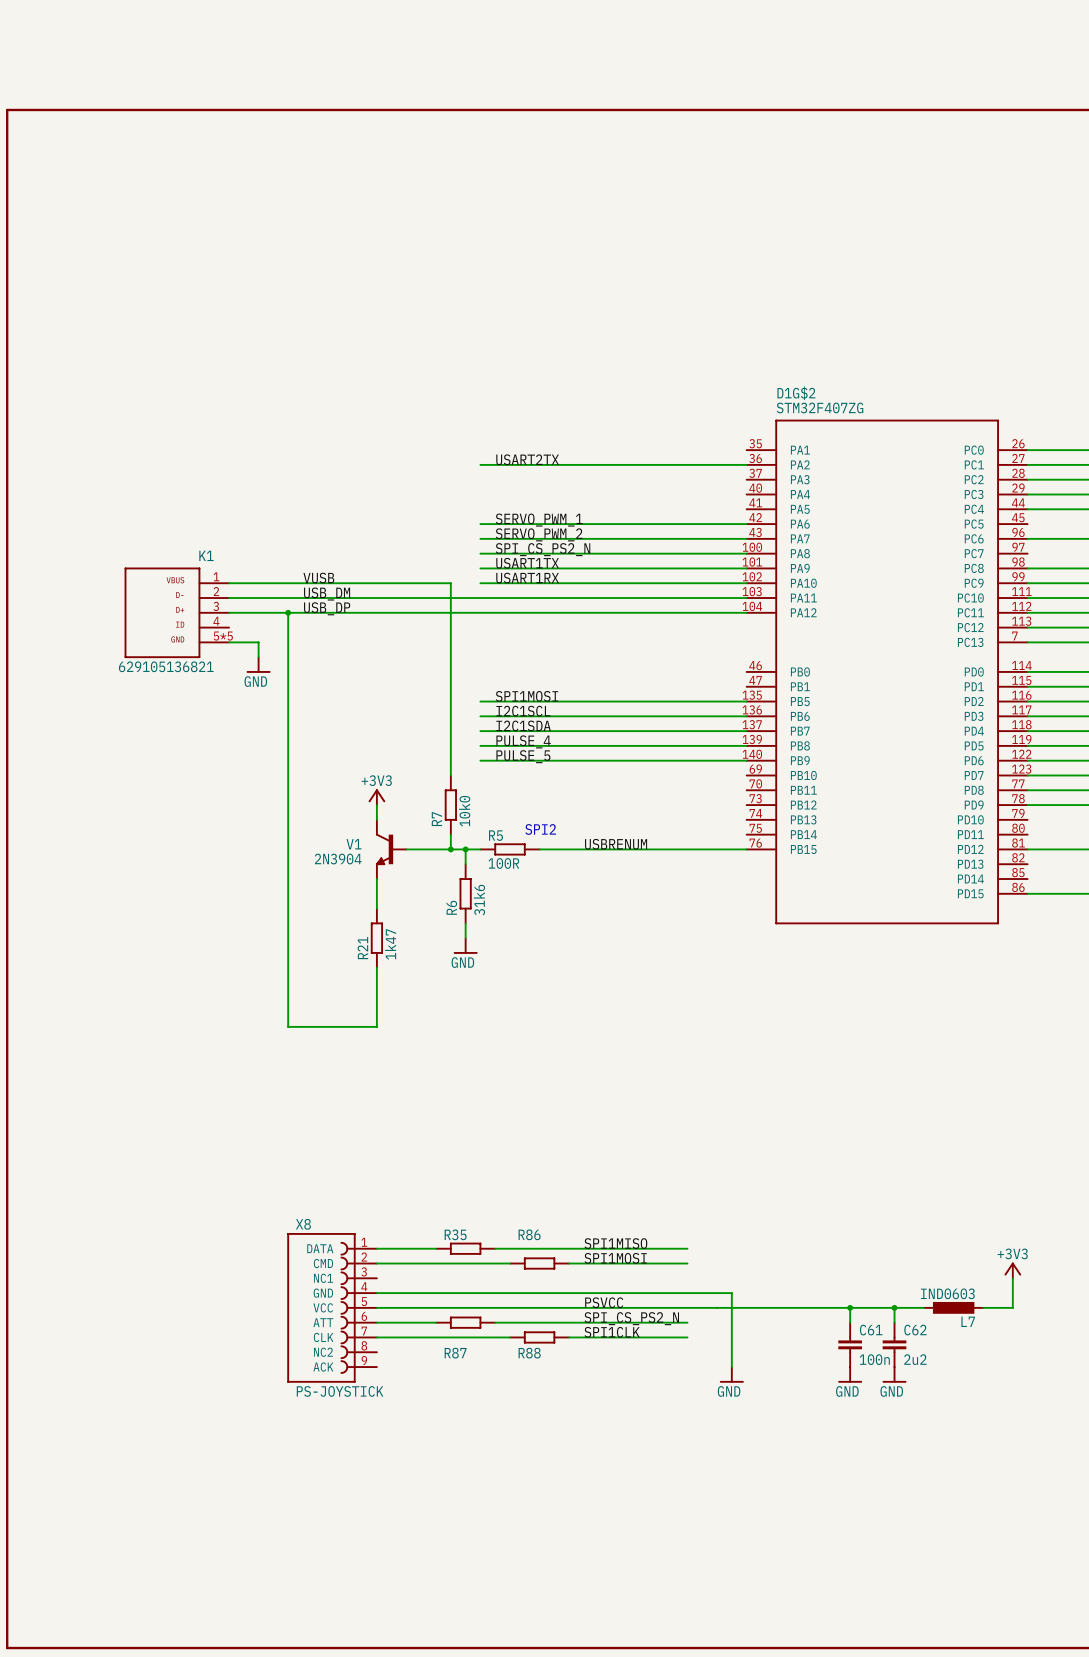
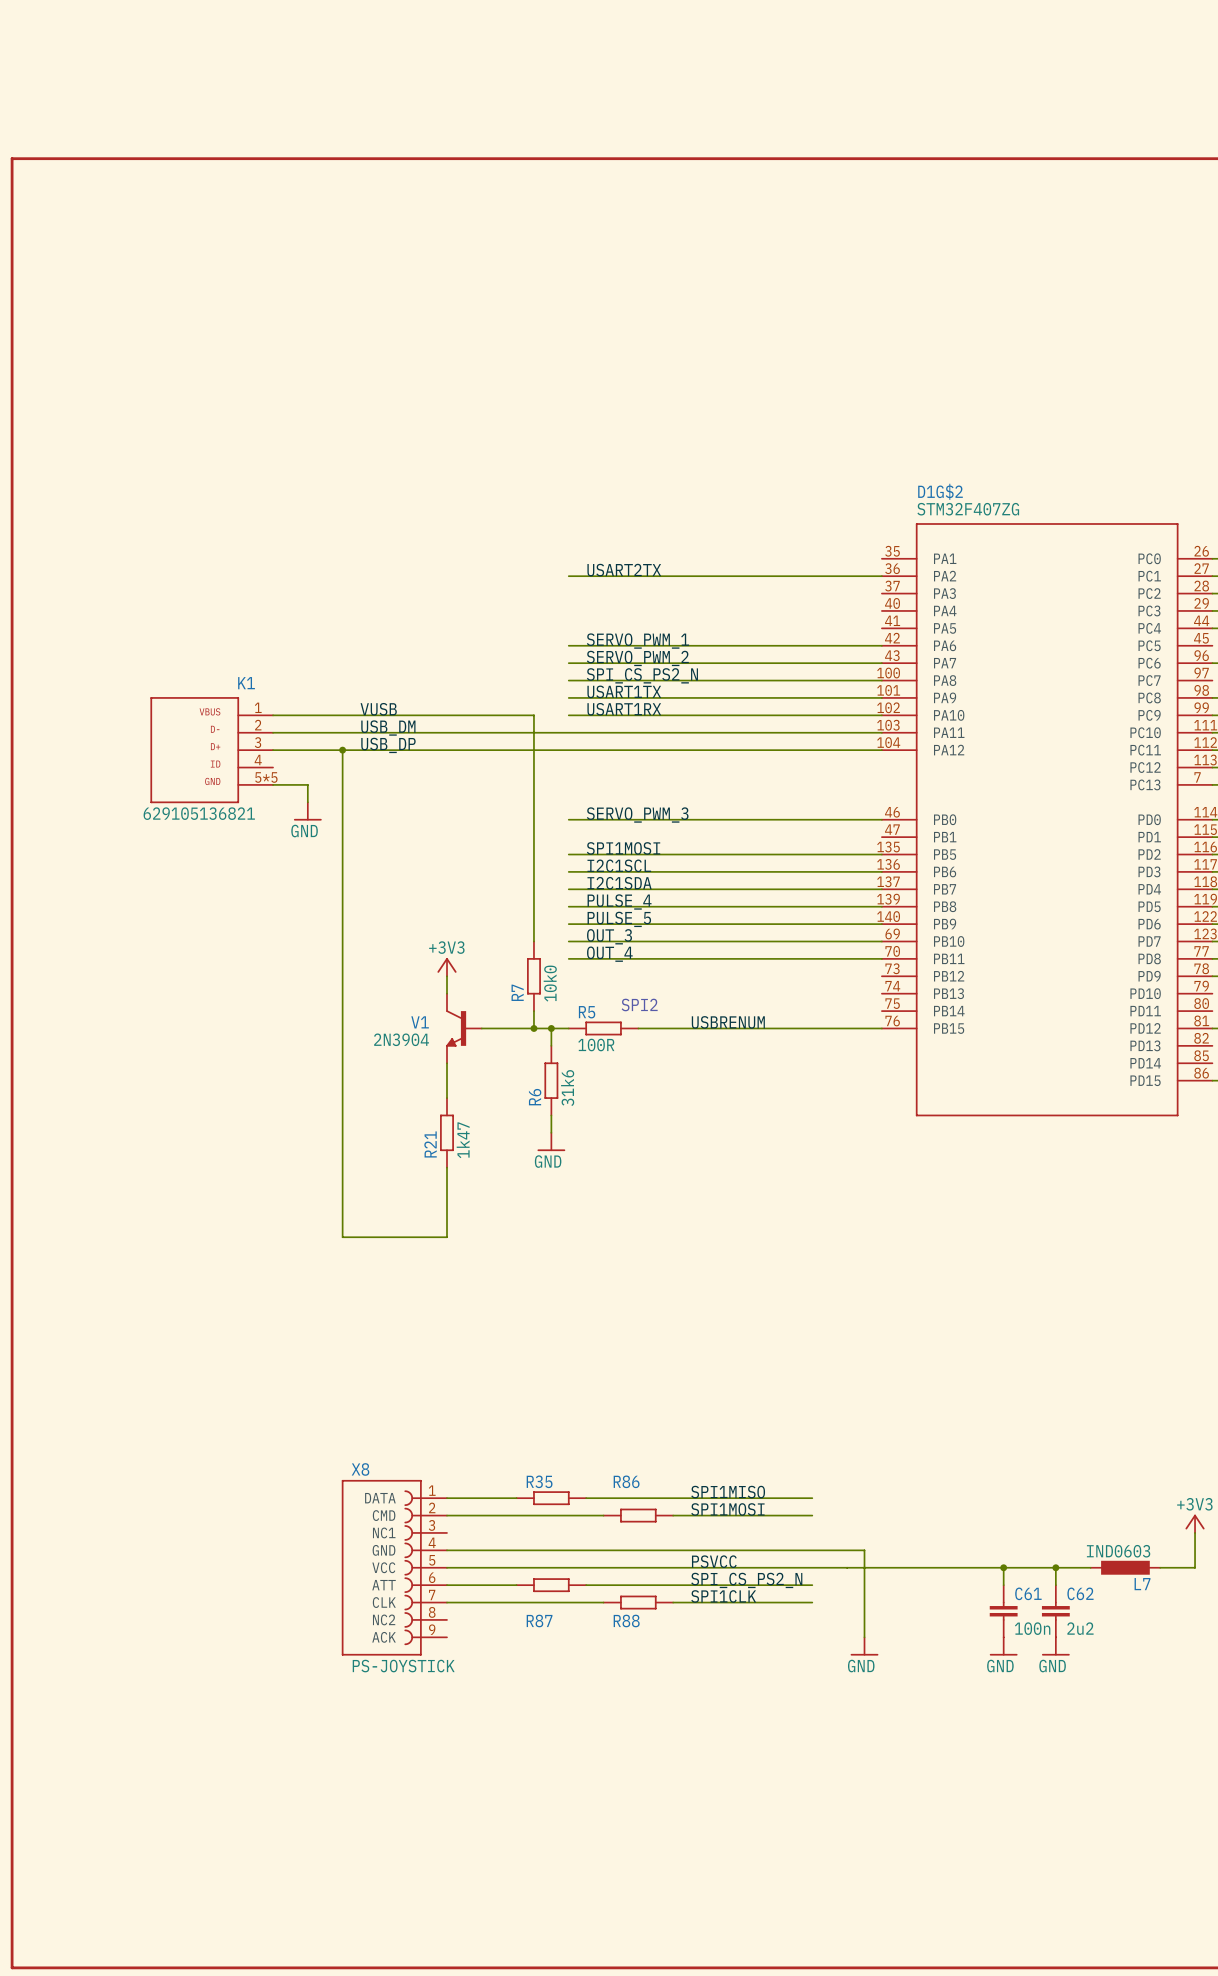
label: none -> SERVO_PWM_3 (637, 815)
wire: none -> (568, 819) (881, 819)
label: none -> OUT_3 (609, 936)
wire: none -> (568, 941) (881, 941)
label: none -> OUT_4 (609, 954)
wire: none -> (568, 958) (881, 958)

